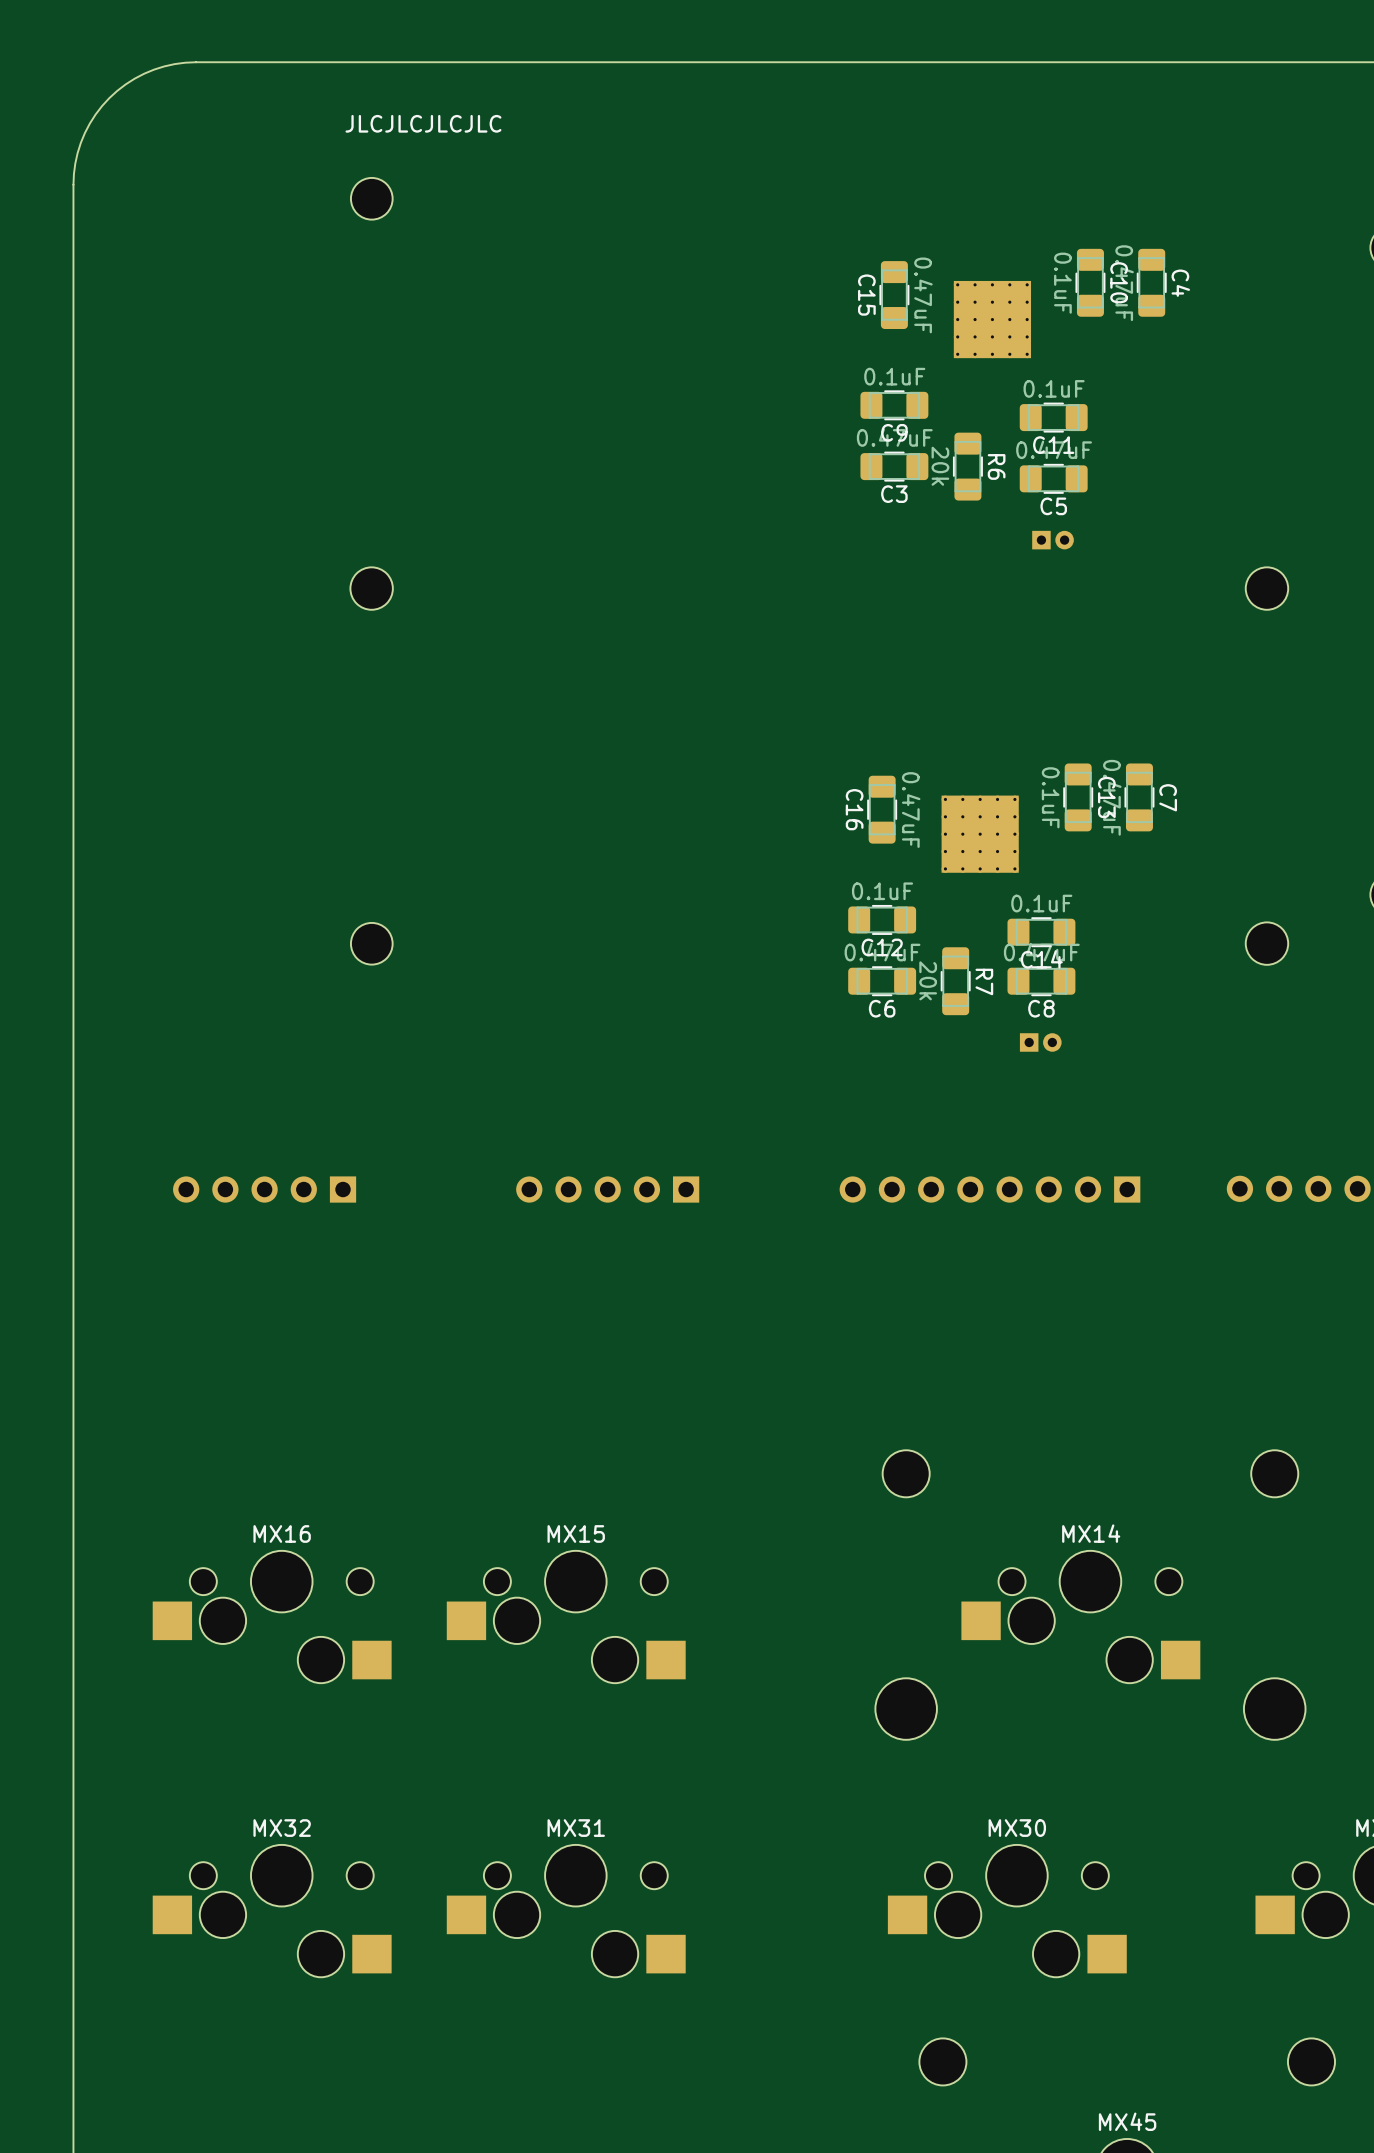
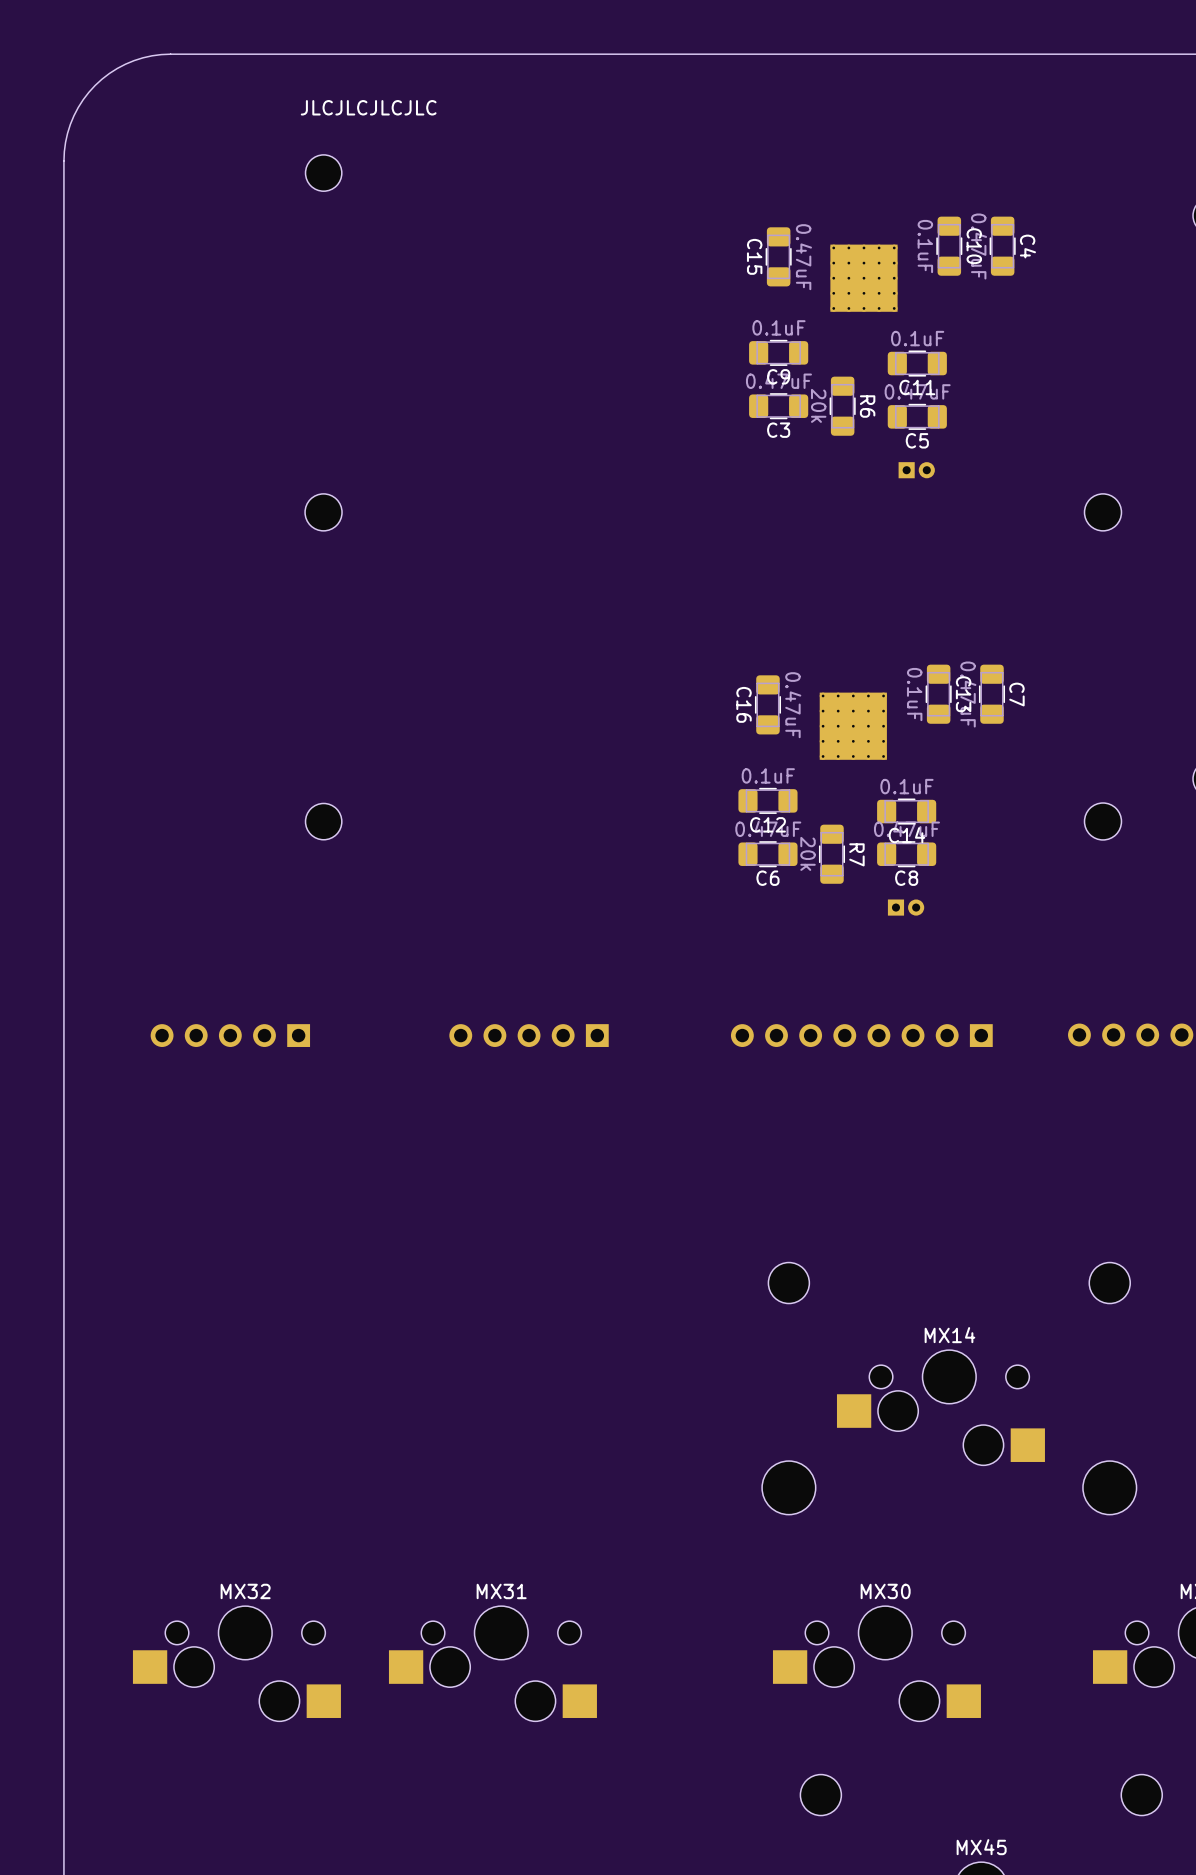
MX16: (272, 1617) -> none
MX15: (566, 1617) -> none

